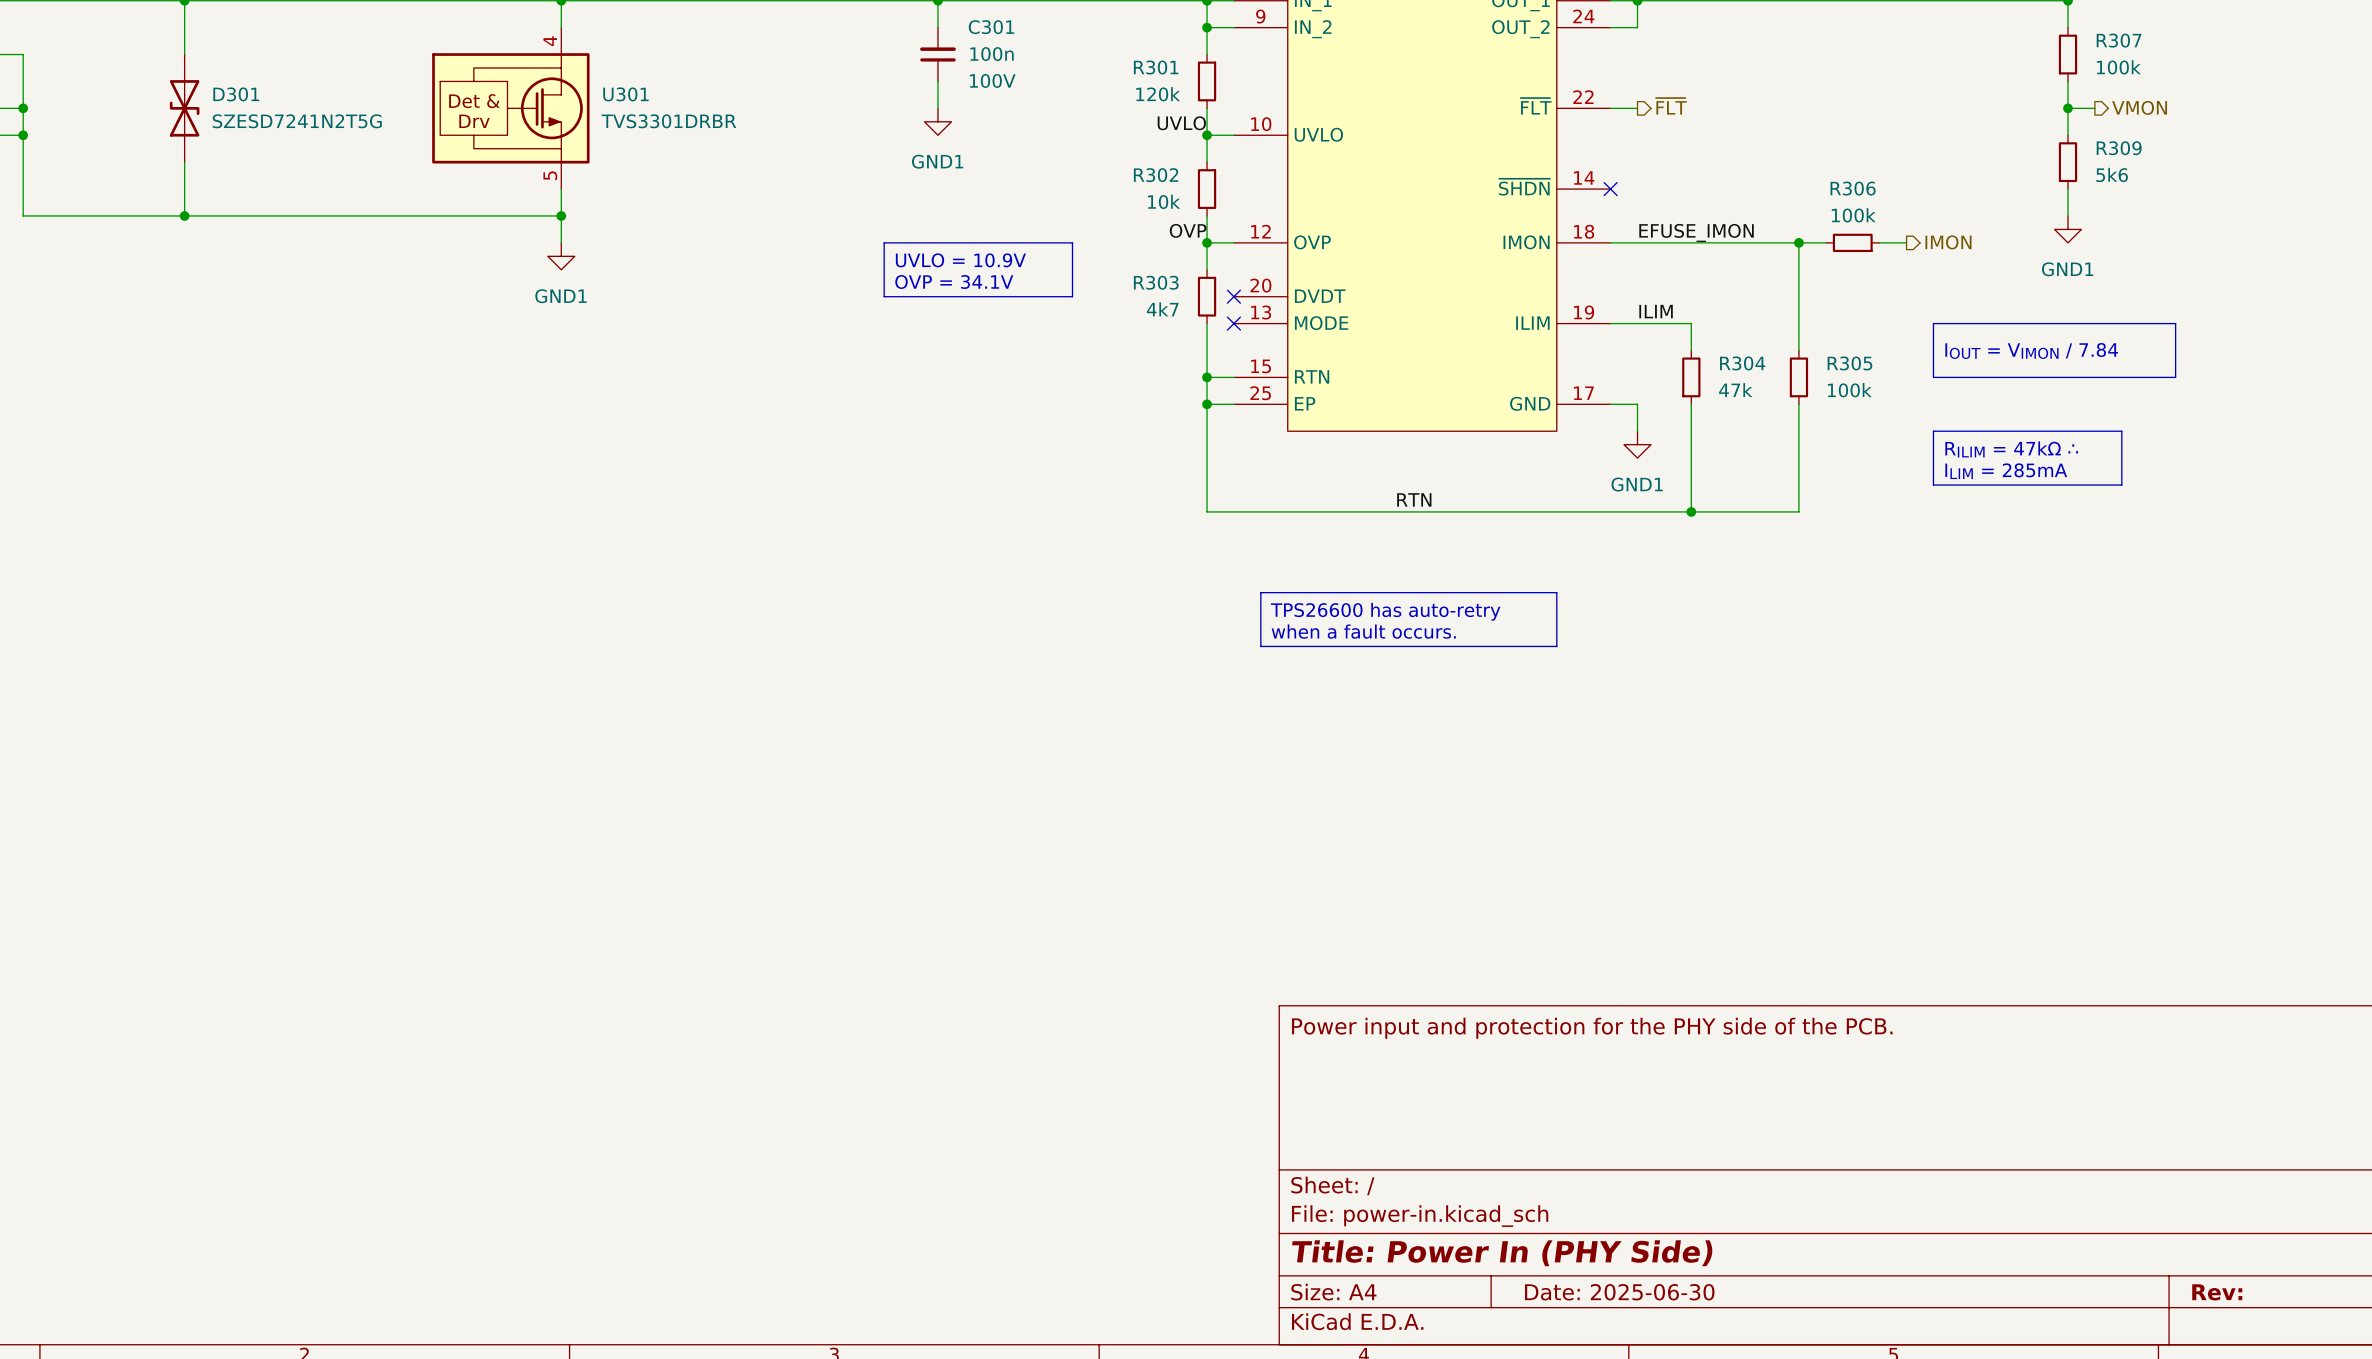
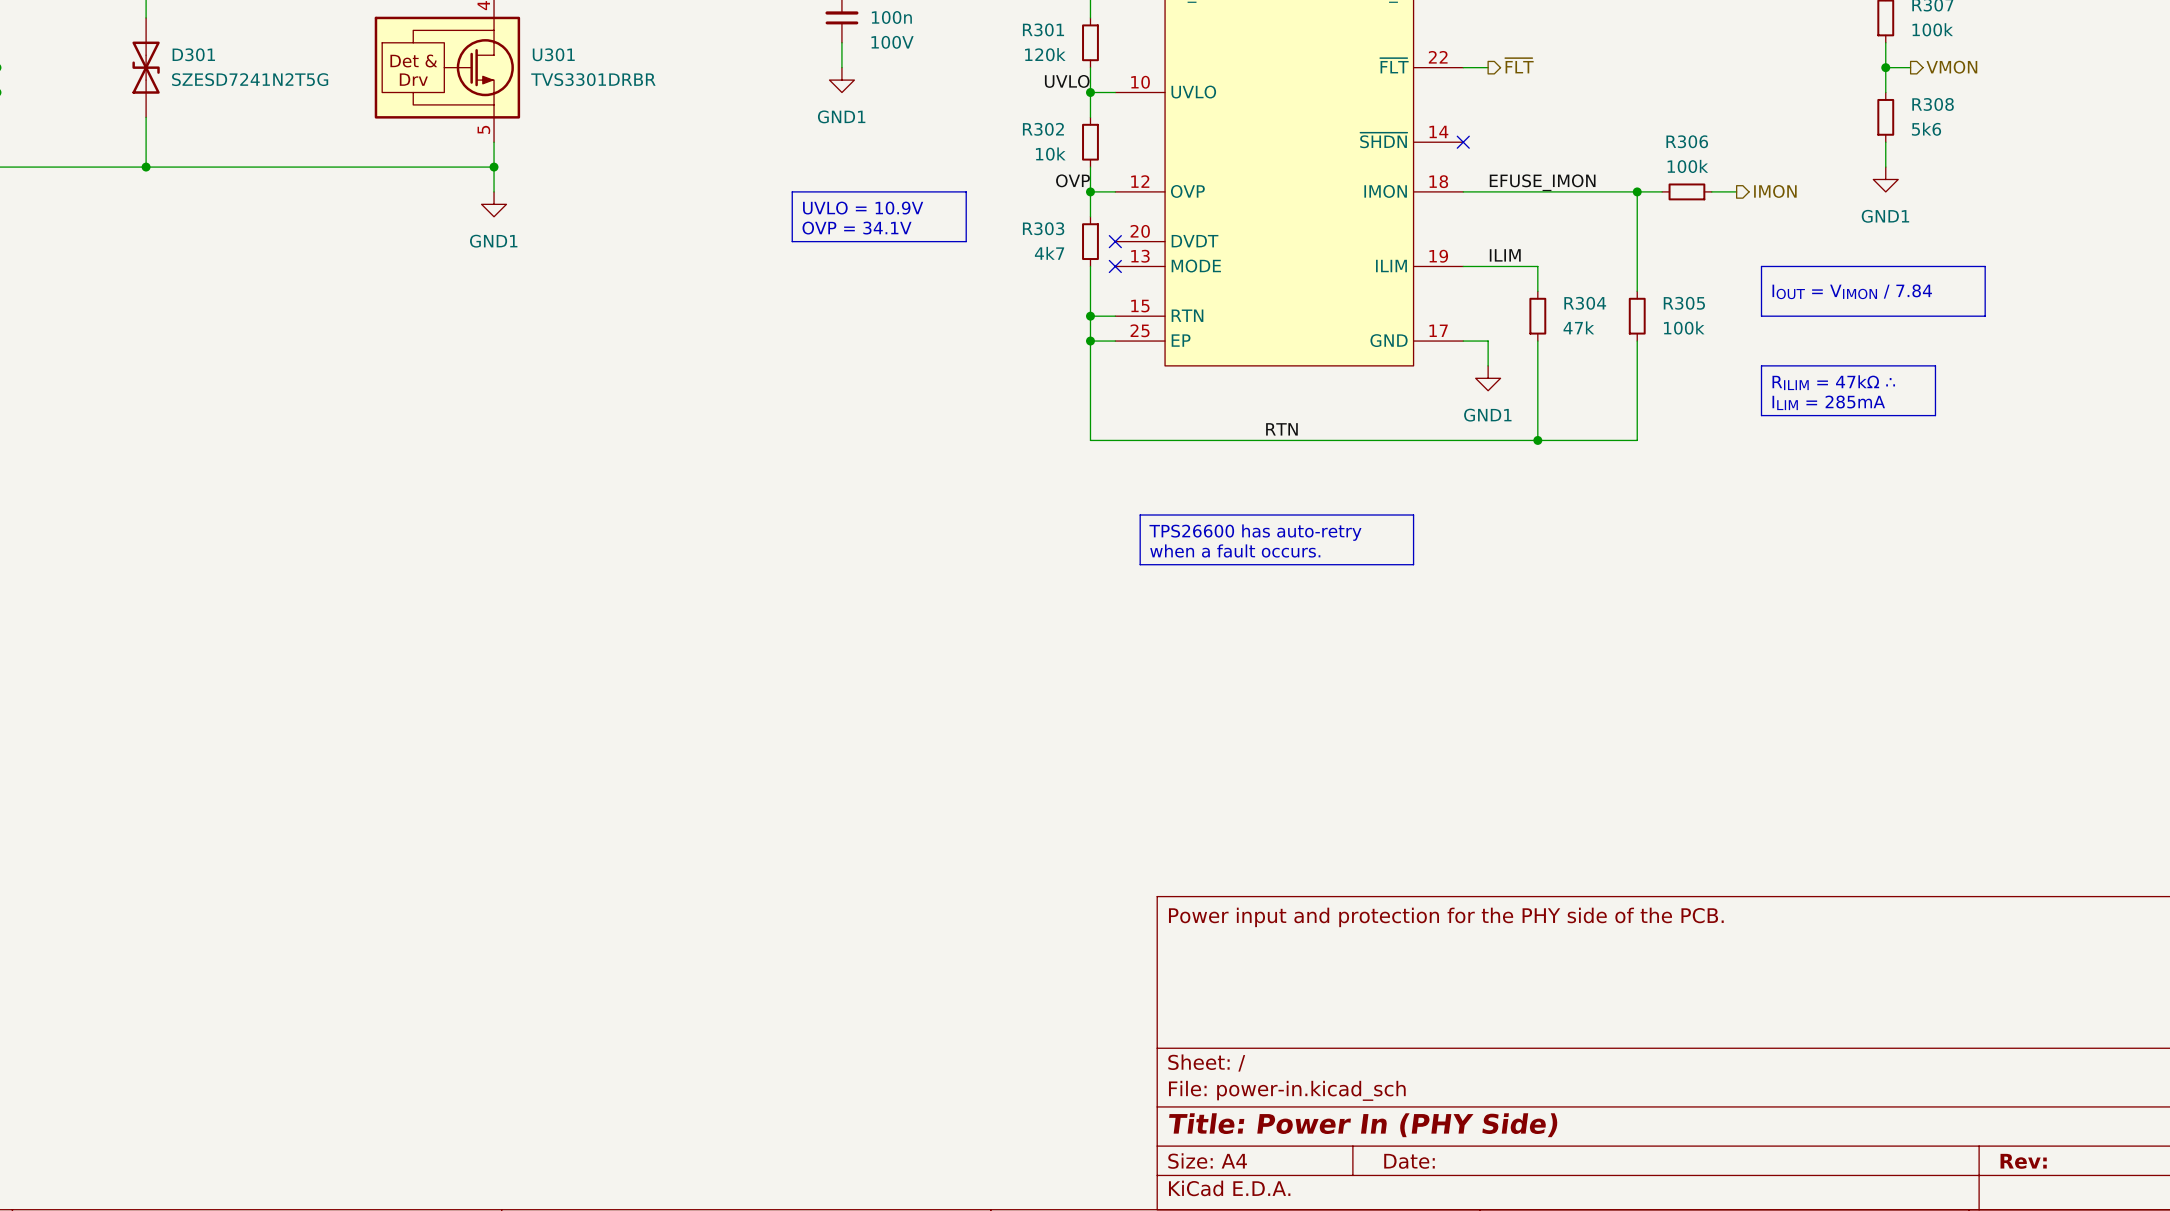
R309 name: R309 (2119, 148) -> R308 (1933, 104)
title block: Date: 2025-06-30 (1619, 1292) -> Date: (1409, 1161)

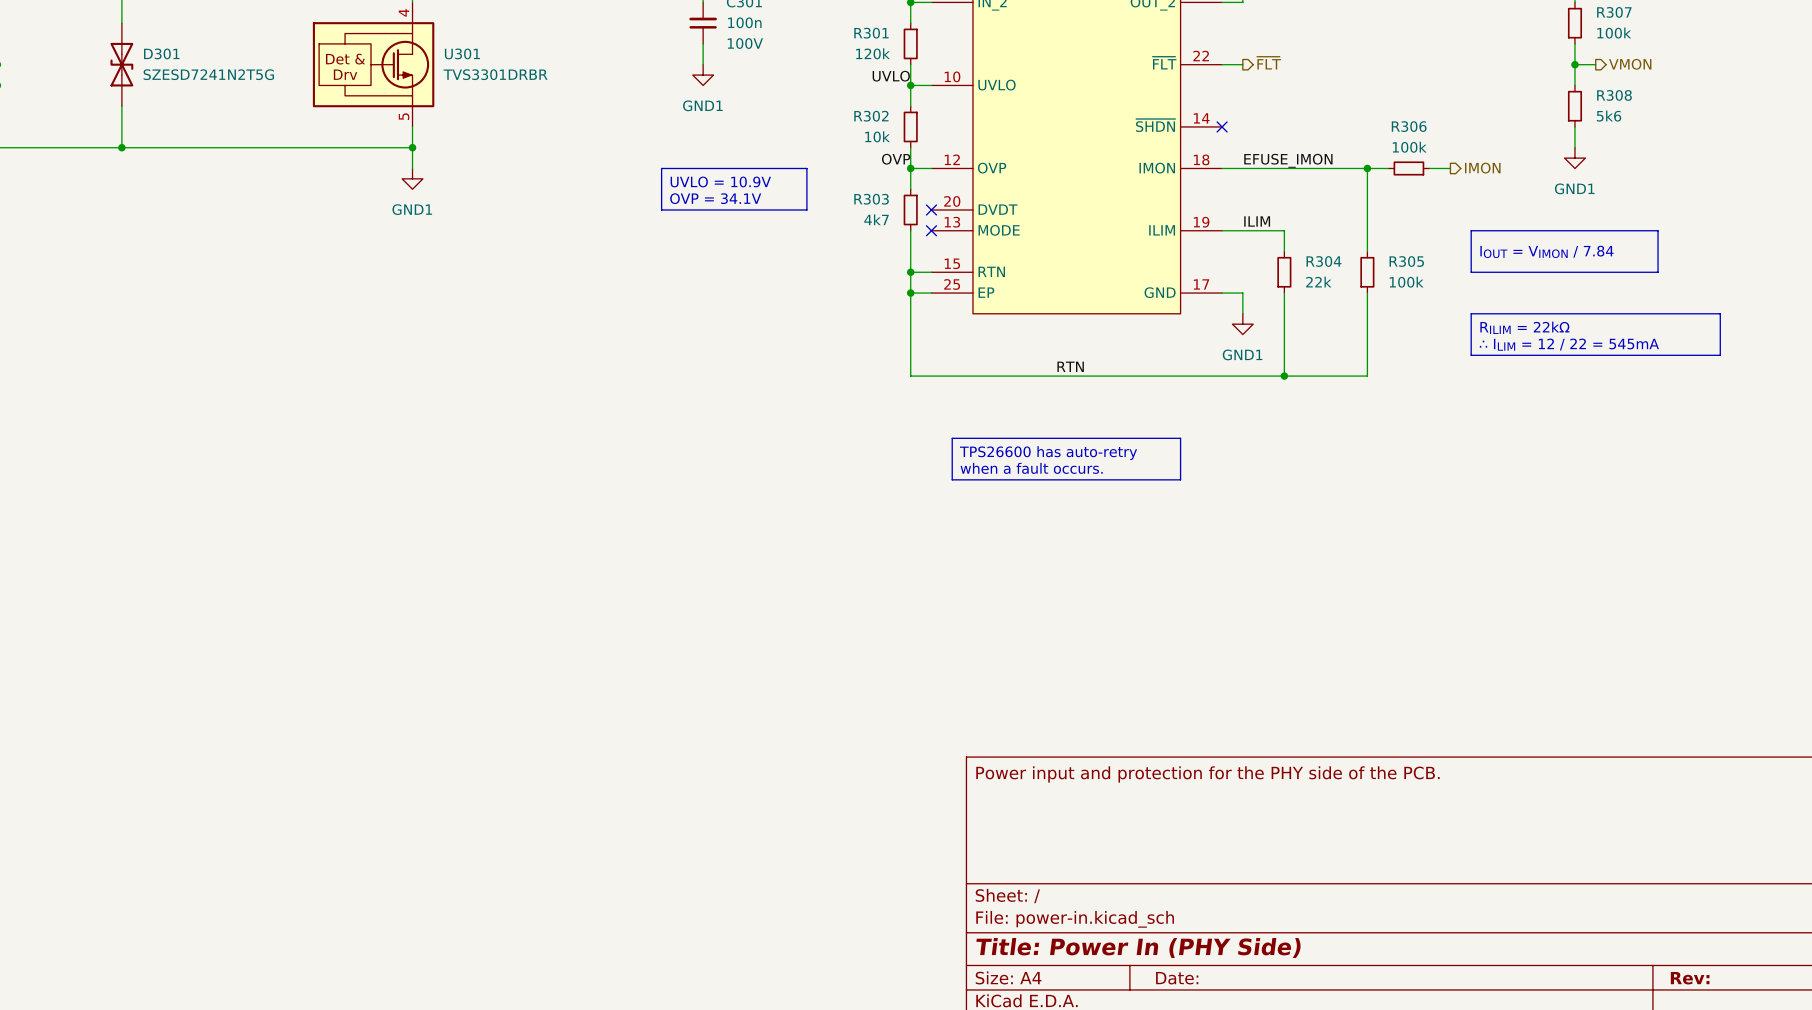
R304 value: 47k (1578, 327) -> 22k (1318, 282)
line: (1935, 365) (1935, 415) -> (1616, 313) (1720, 313) (1720, 355) (1616, 355)
text: RILIM = 47kΩ ∴ (1833, 382) -> RILIM = 22kΩ (1524, 327)
text: ILIM = 285mA (1828, 402) -> ∴ ILIM = 12 / 22 = 545mA (1569, 344)

